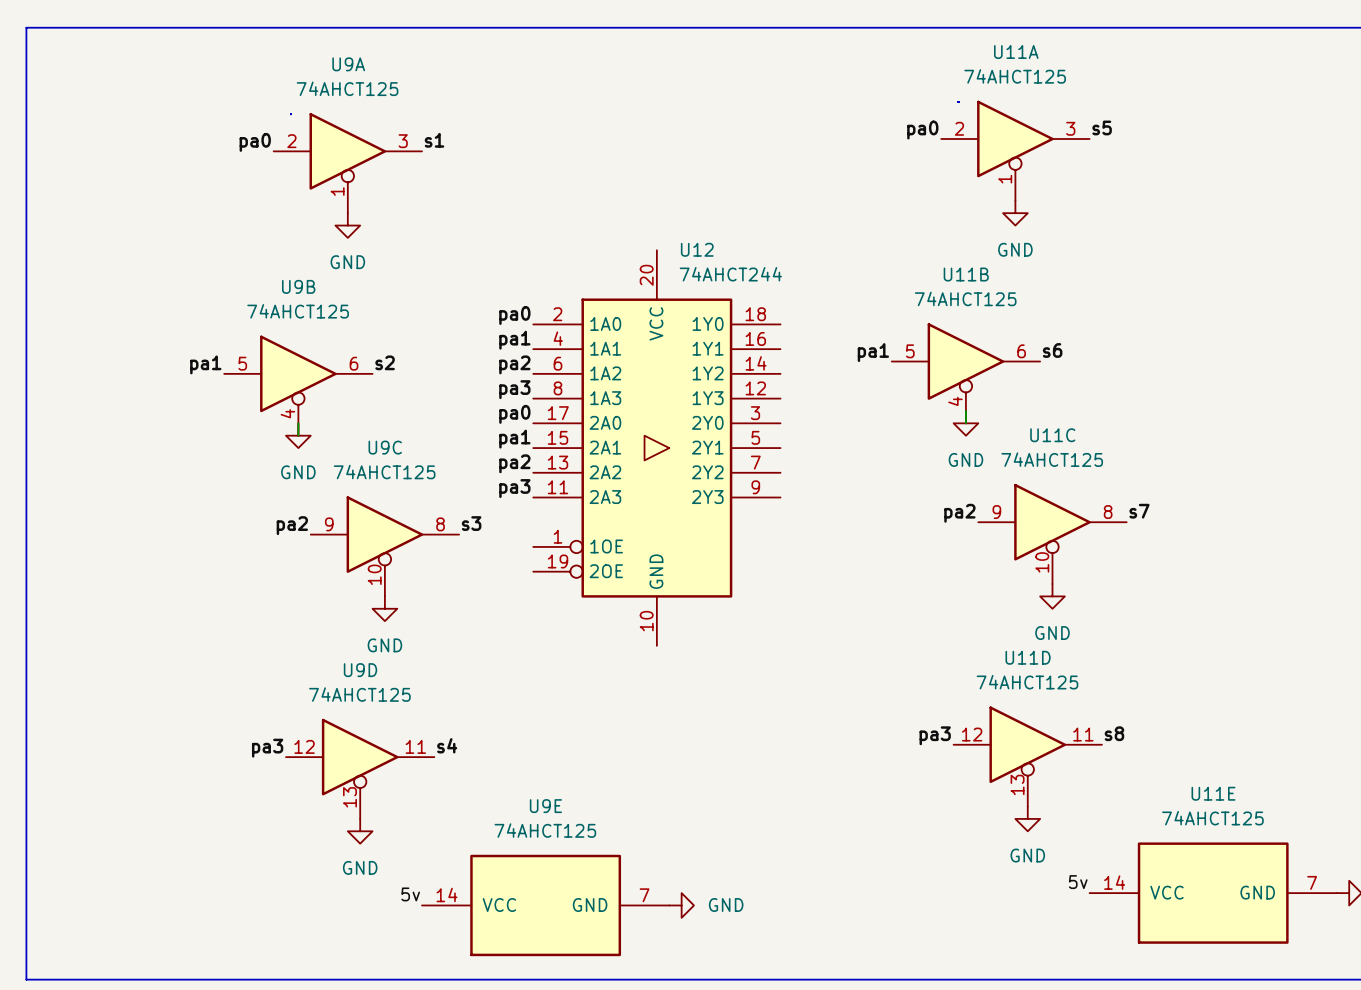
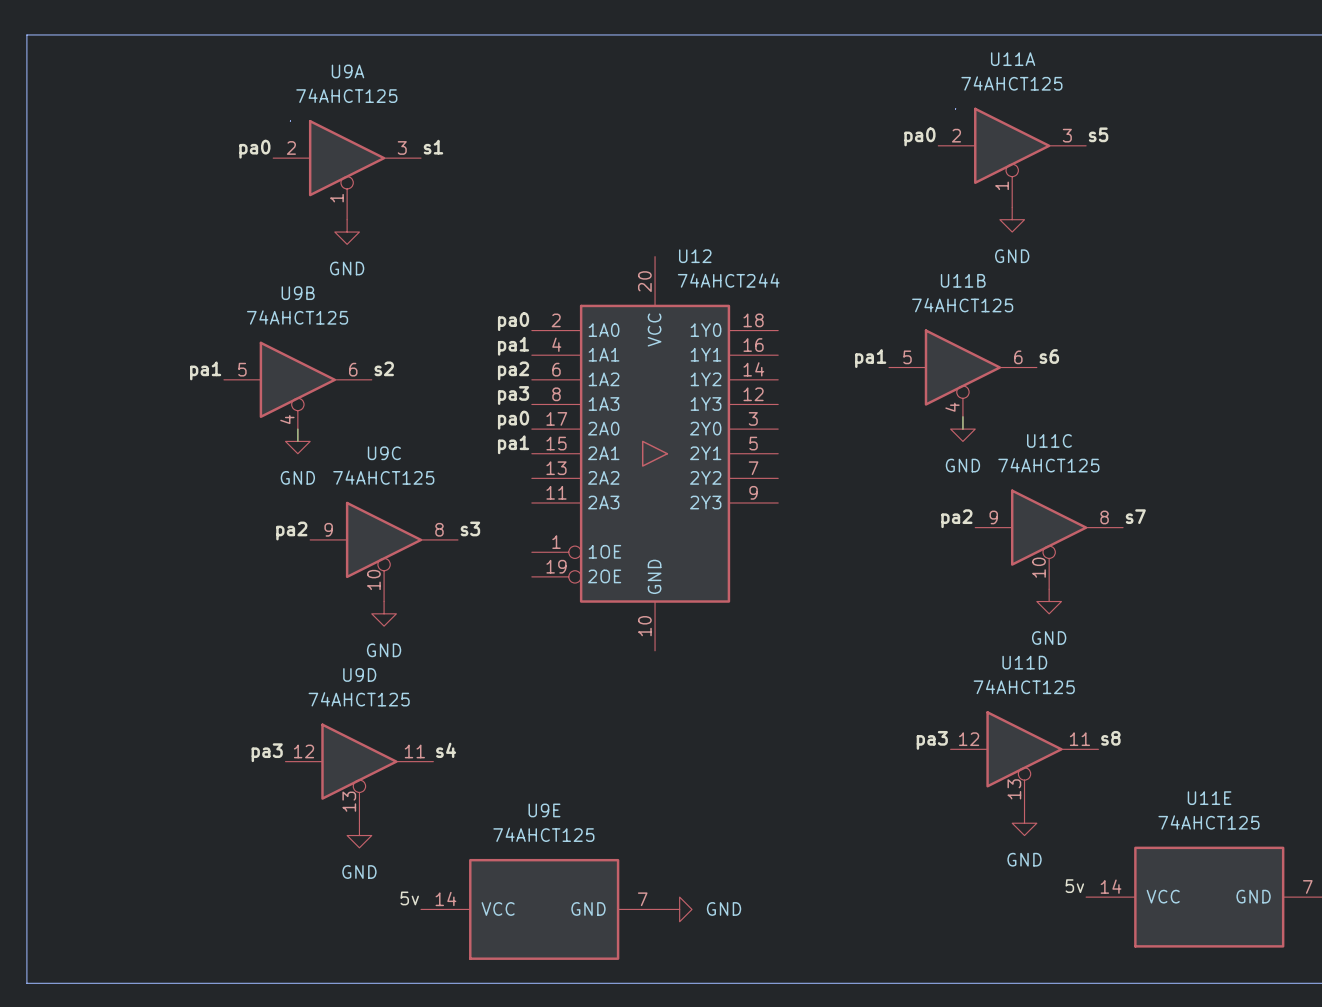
label: pa2 (514, 463) -> none
label: pa3 (514, 488) -> none

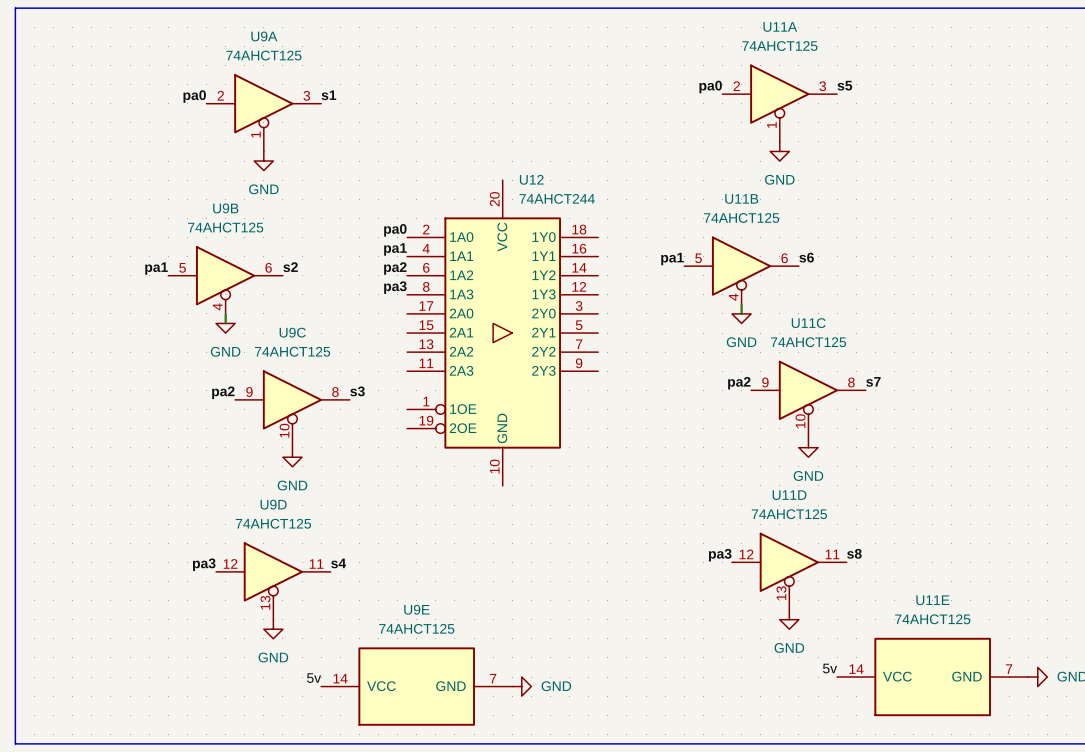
label: pa0 (513, 420) -> none
label: pa1 (513, 444) -> none

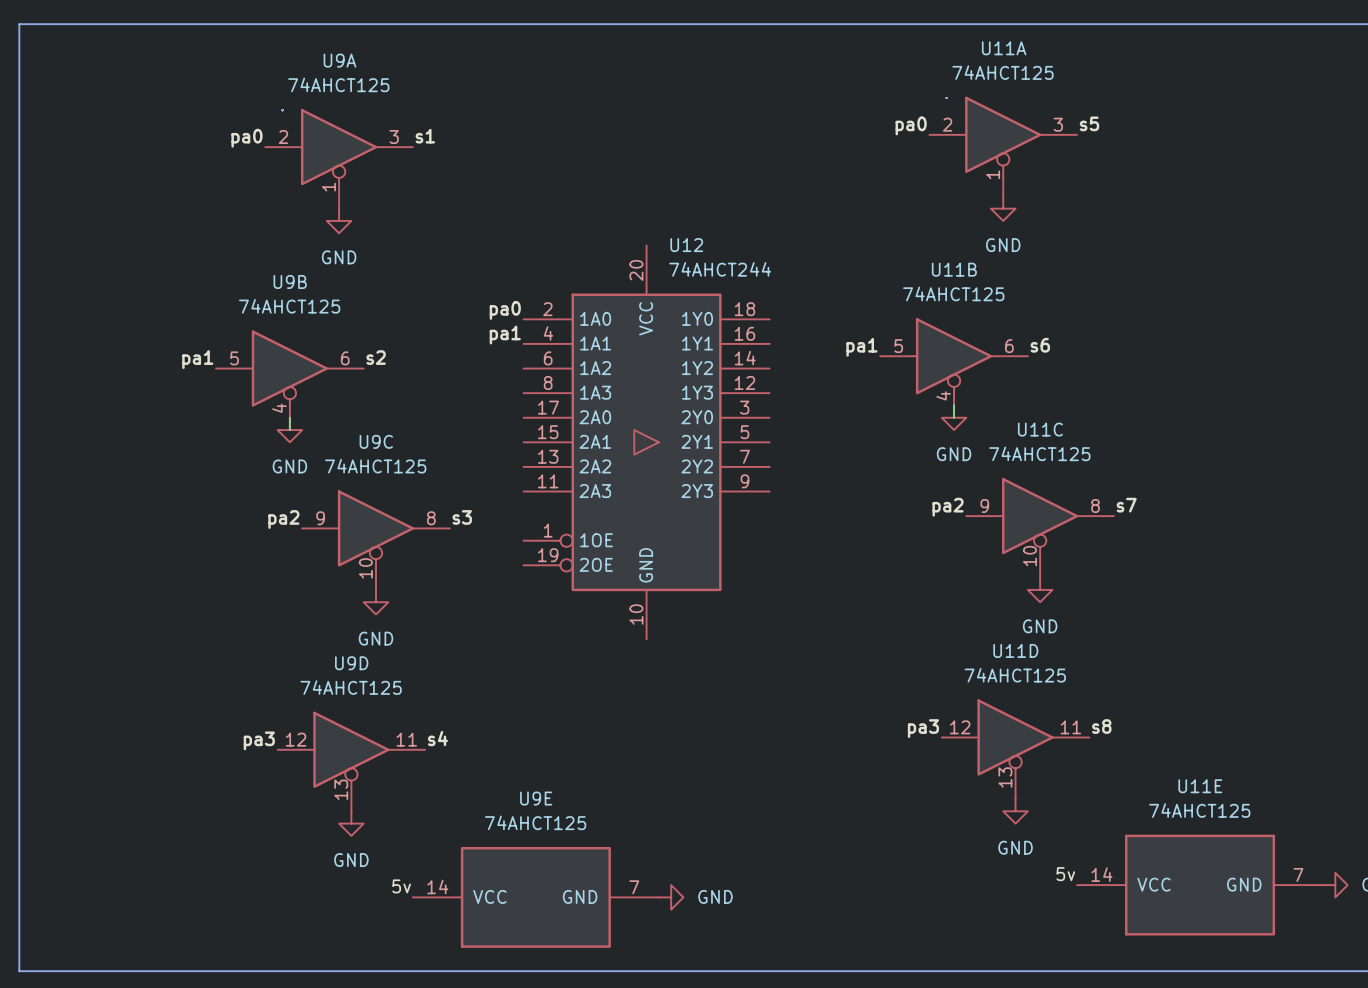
label: pa2 (395, 268) -> none
label: pa3 (395, 287) -> none

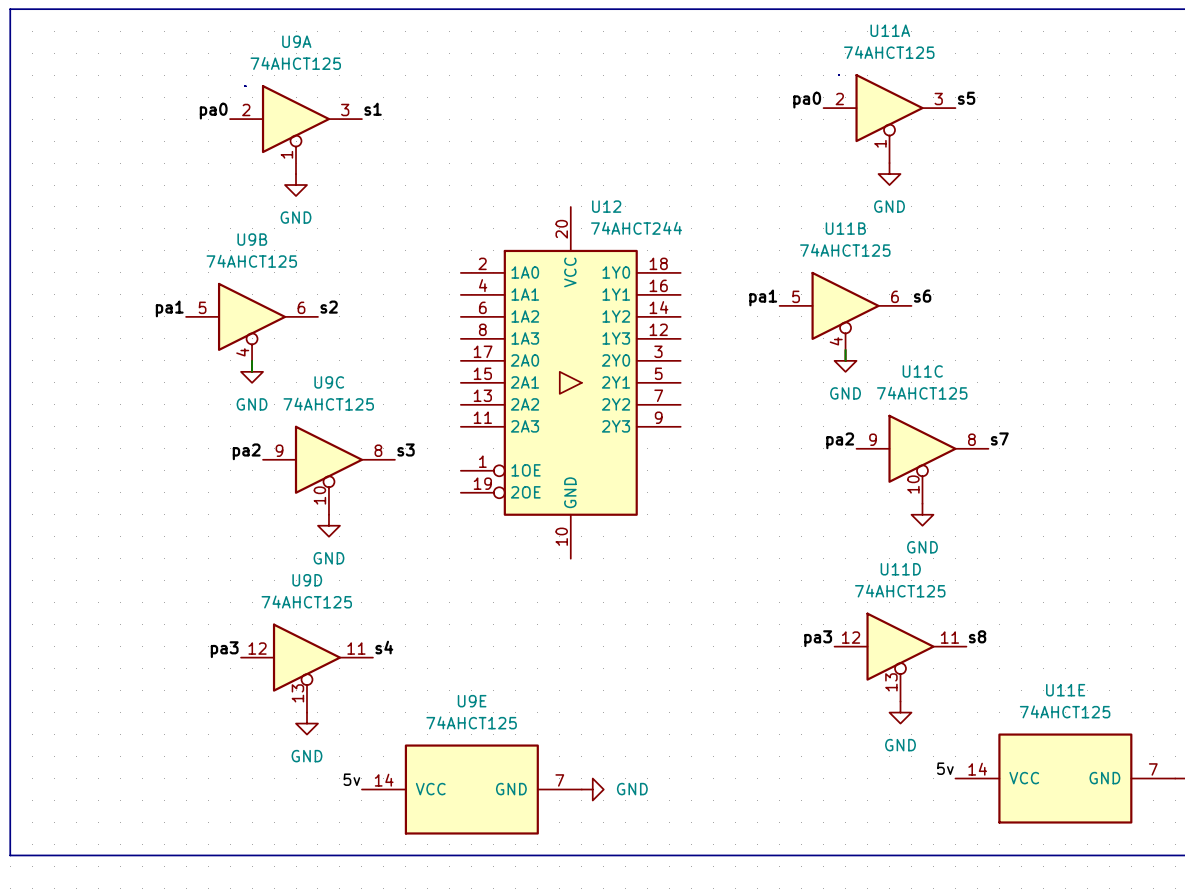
label: pa0 (505, 310) -> none
label: pa1 (505, 335) -> none

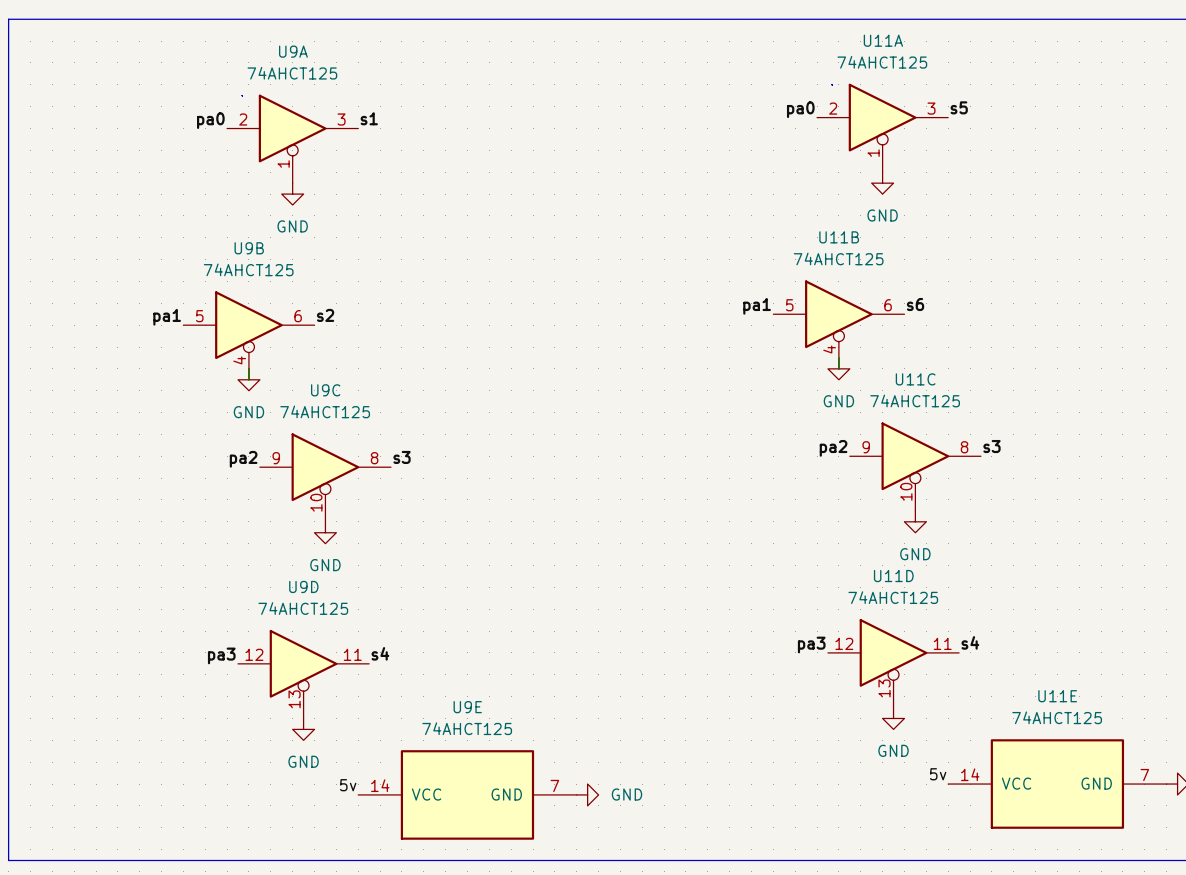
U12: 74AHCT244 (570, 382) -> none
label: s7 (999, 438) -> s3 (991, 446)
label: s8 (977, 636) -> s4 (970, 642)

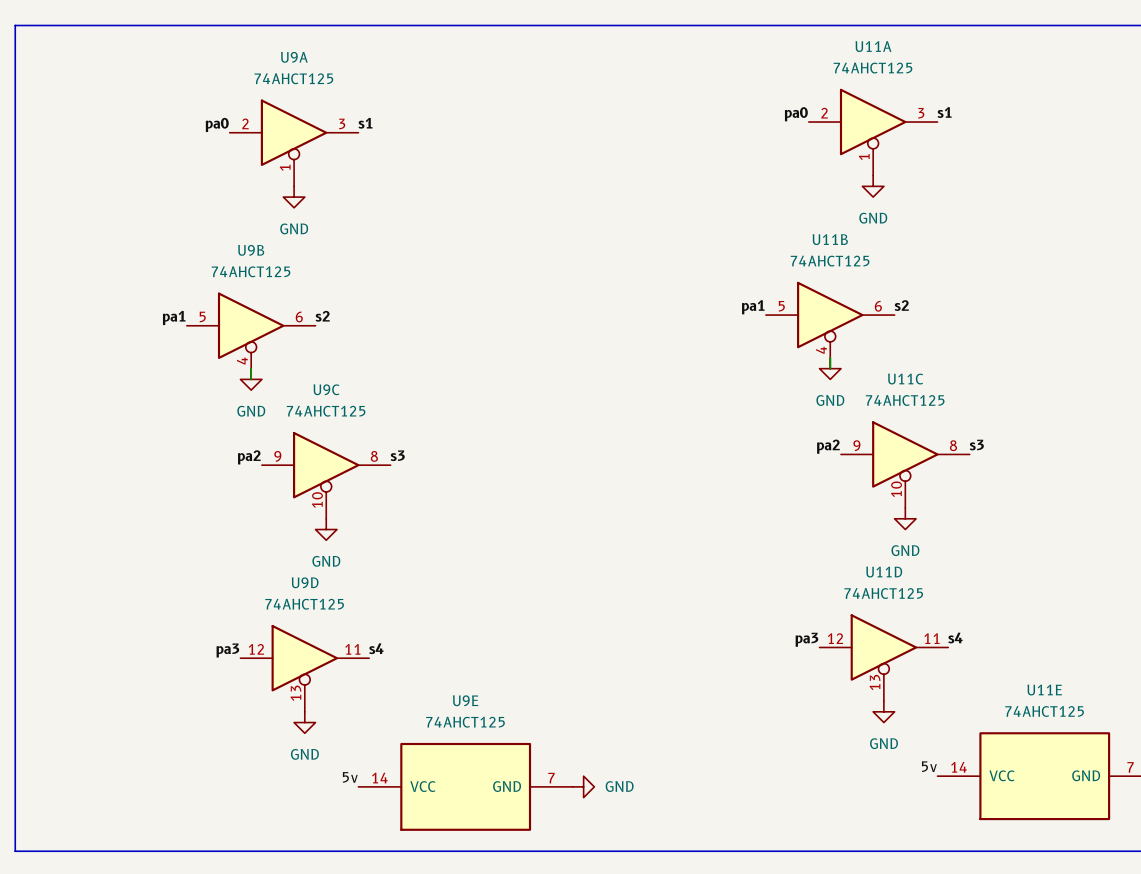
label: s5 (959, 107) -> s1 (944, 112)
label: s6 (915, 304) -> s2 (901, 305)

